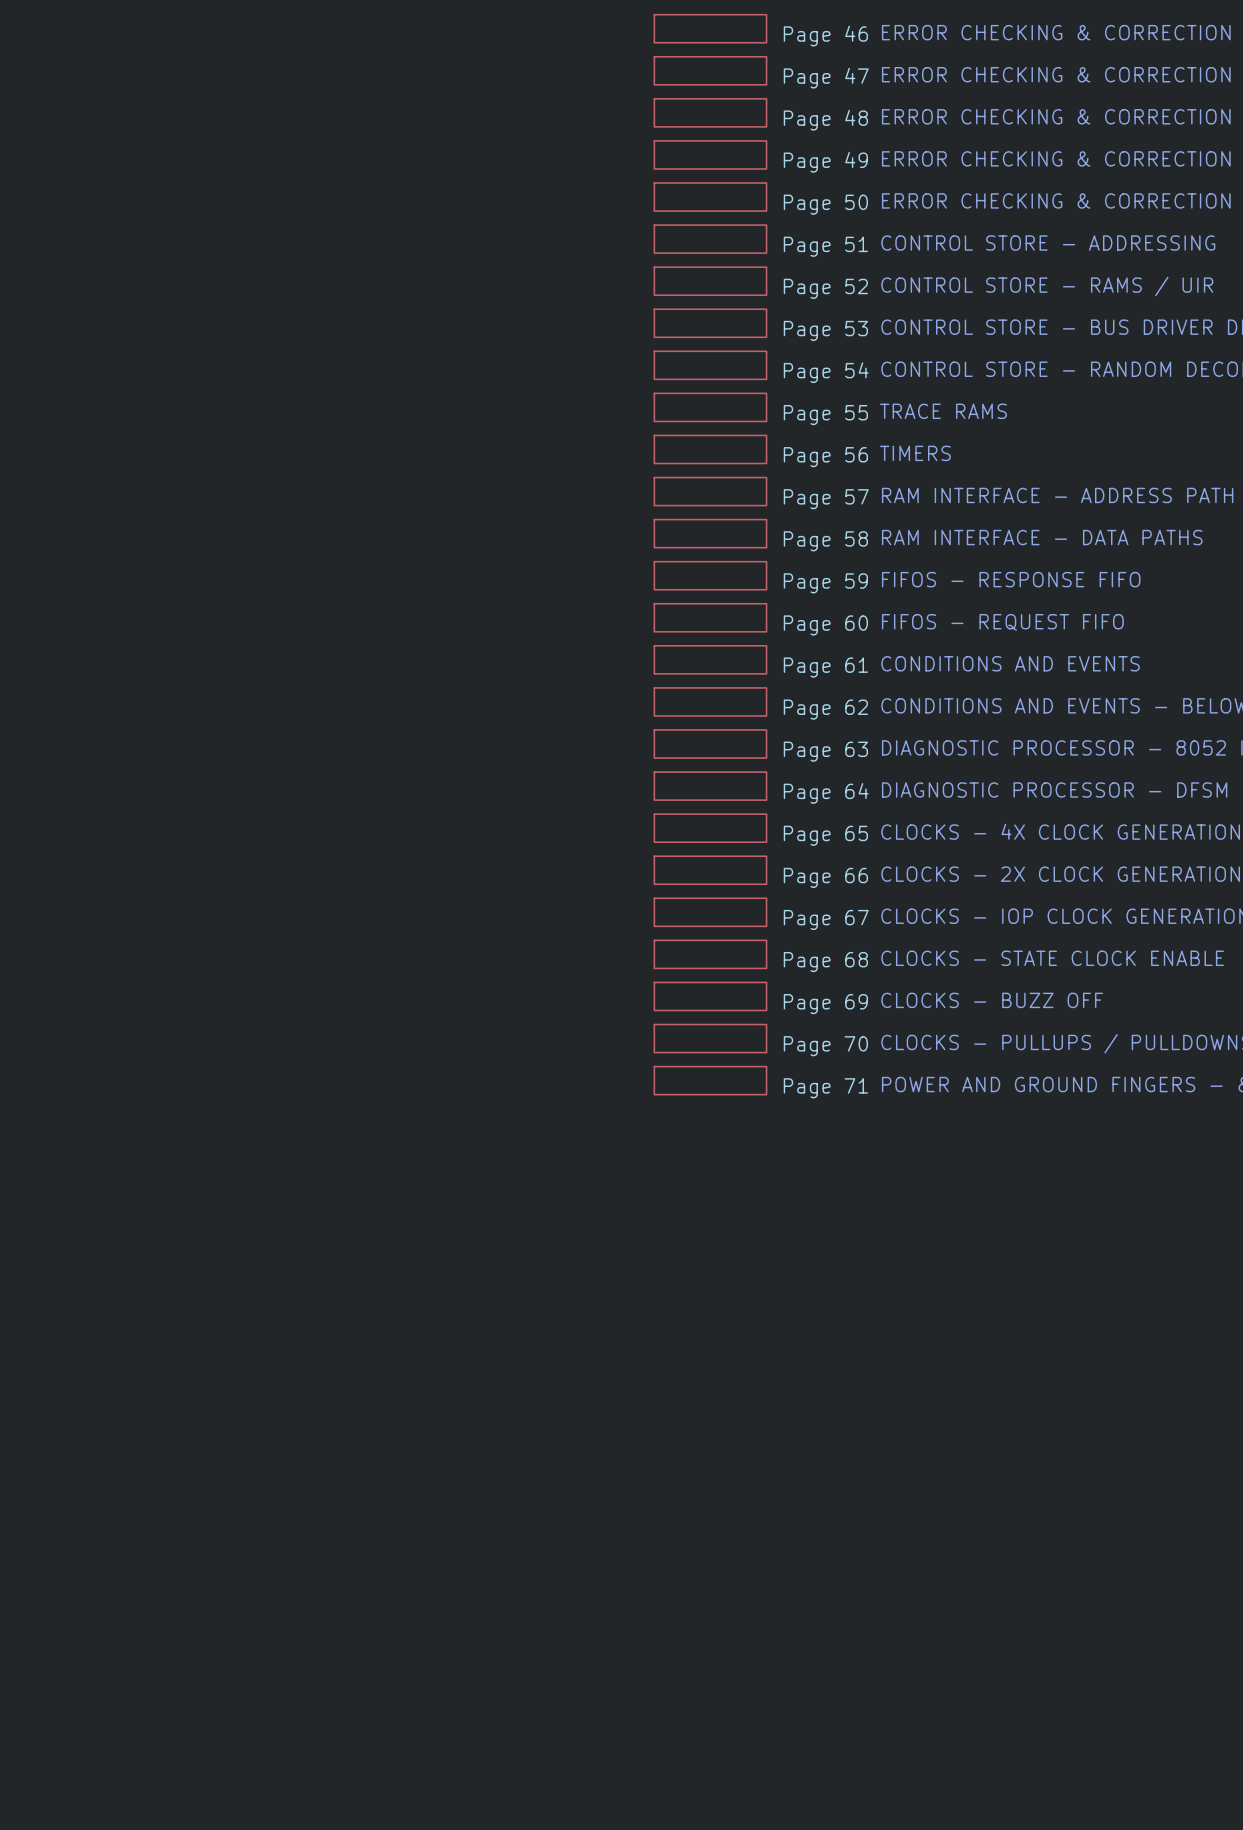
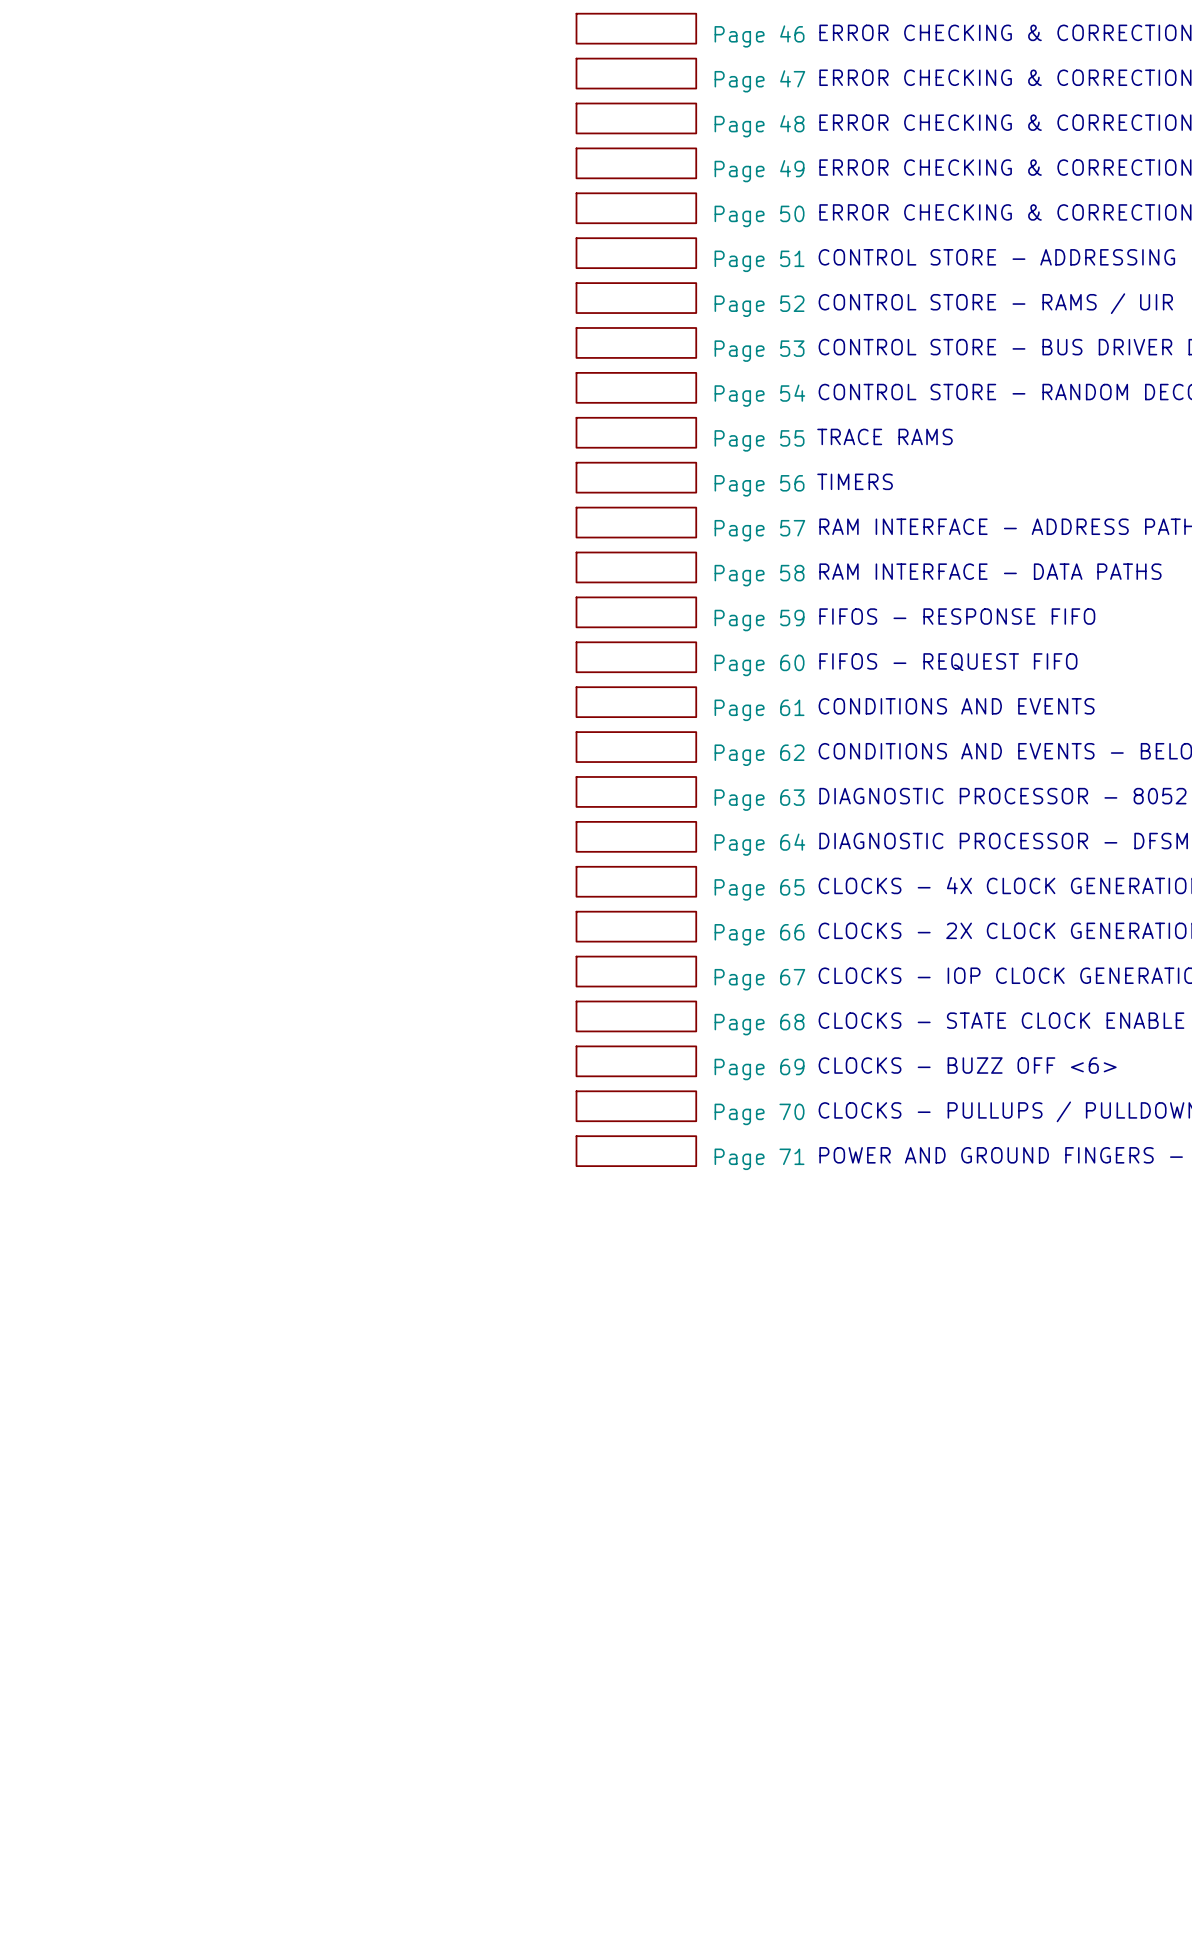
text: CLOCKS - BUZZ OFF (992, 1000) -> CLOCKS - BUZZ OFF <6> (967, 1065)

